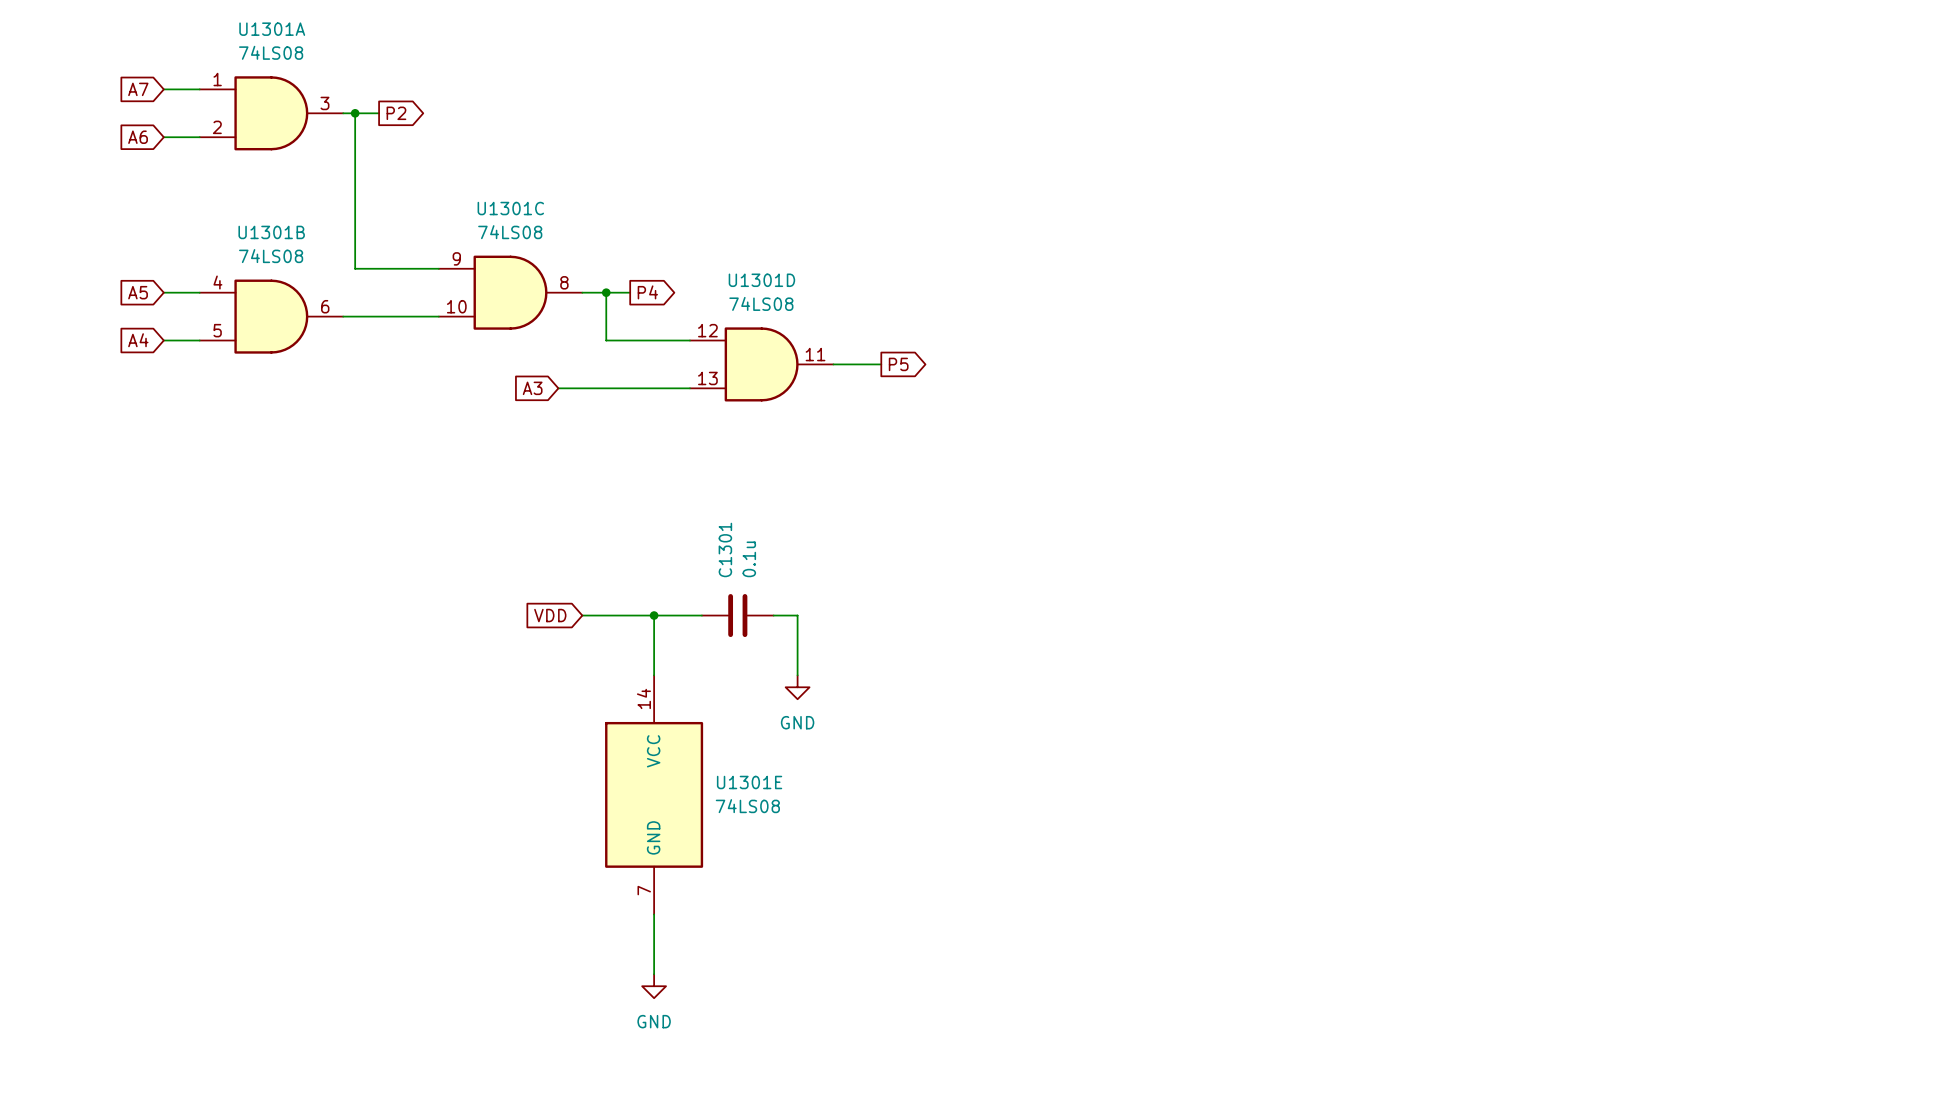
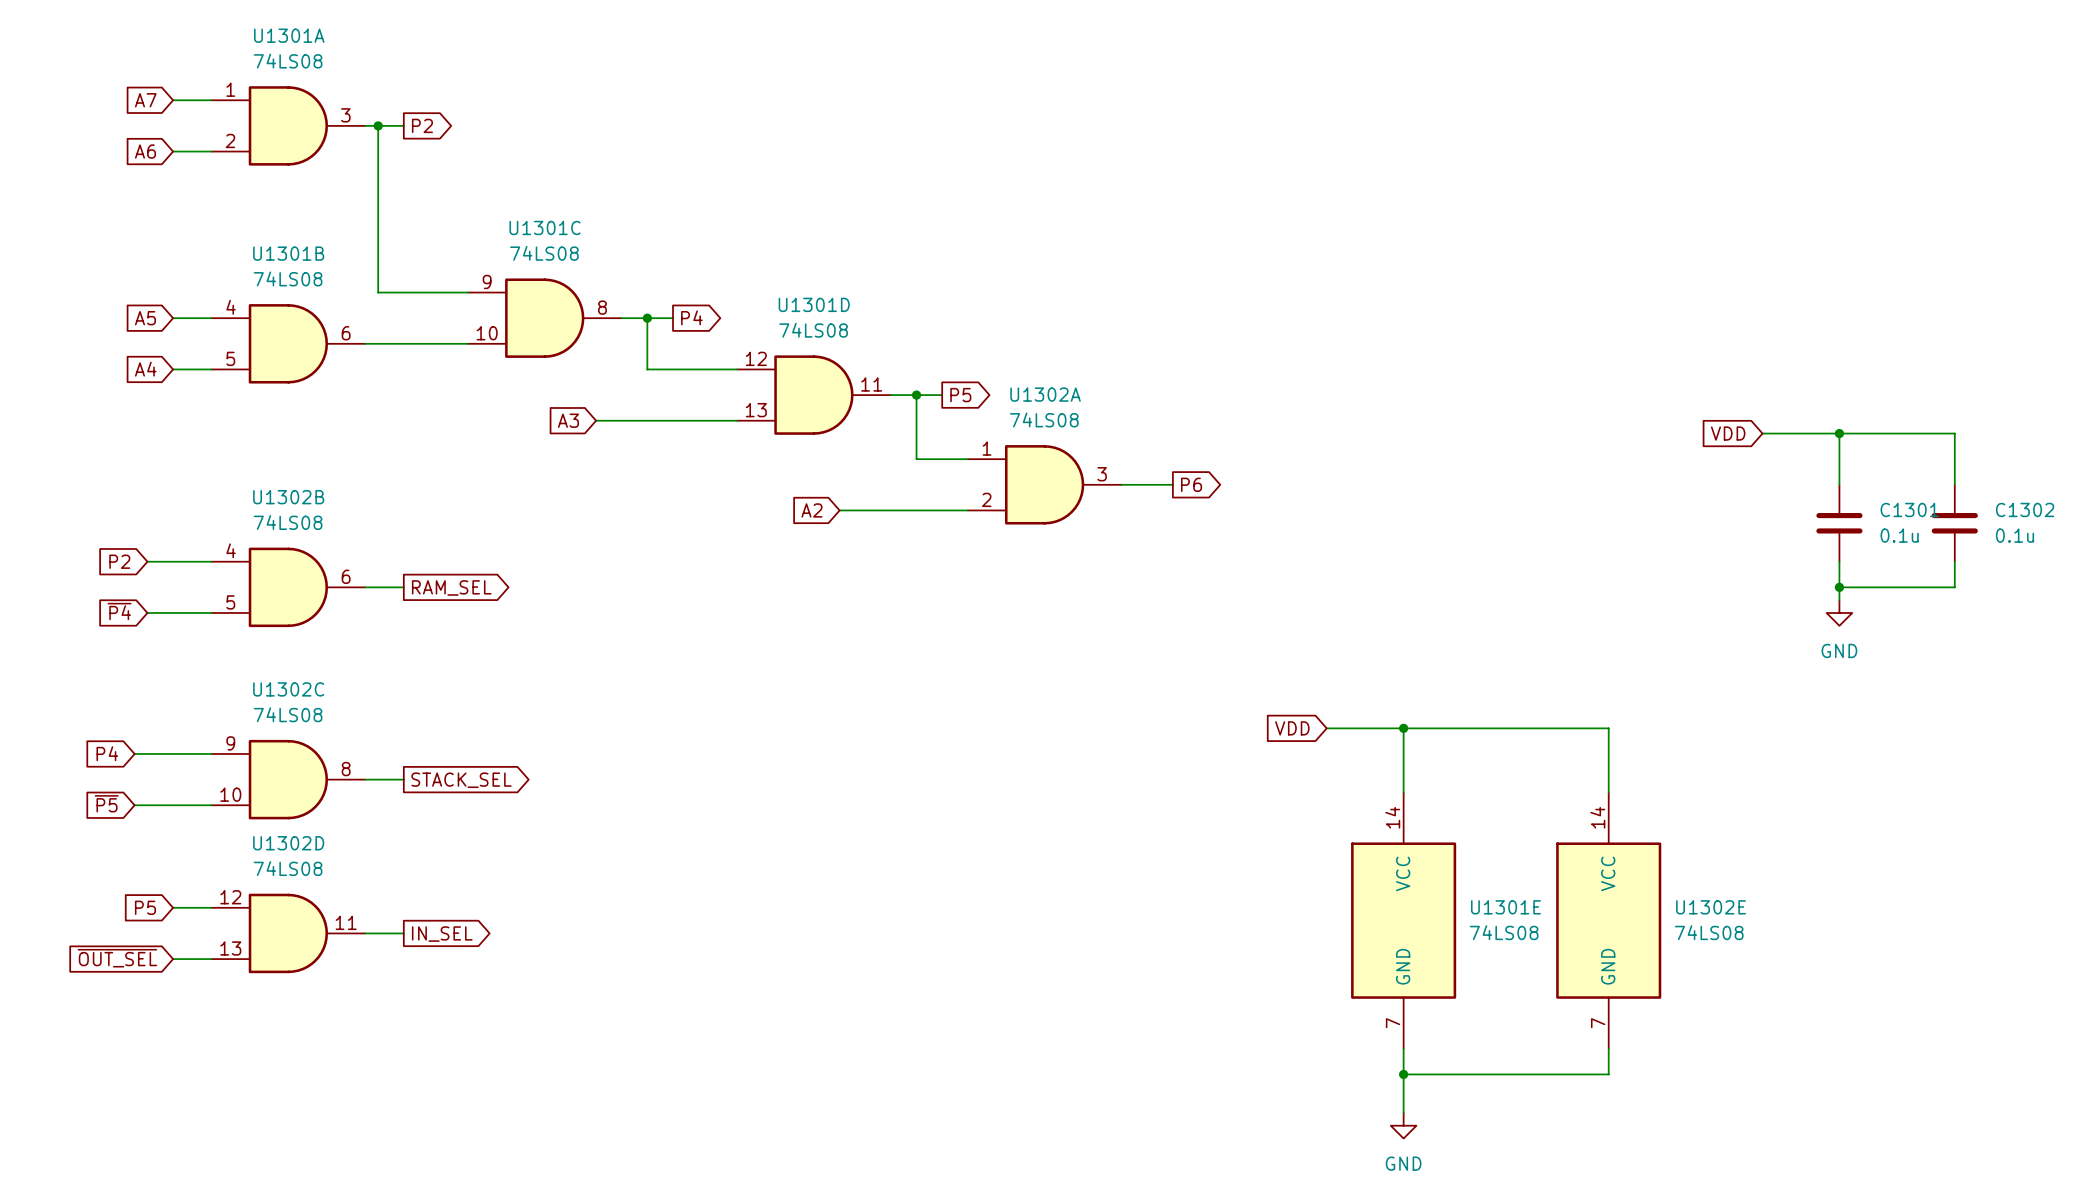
wire: none -> (916, 395) (916, 459) (967, 459)
junction: none -> (916, 395)
global label: none -> VDD (1728, 433)
wire: none -> (1762, 433) (1954, 433) (1954, 484)
wire: none -> (1839, 433) (1839, 484)
junction: none -> (1839, 433)
U1302A: none -> 74LS08 (1044, 484)
wire: none -> (1121, 484) (1172, 484)
global label: none -> P6 (1191, 484)
global label: none -> A2 (811, 510)
wire: none -> (839, 510) (967, 510)
C1302: none -> 0.1u (1954, 523)
global label: none -> P2 (119, 561)
wire: none -> (147, 561) (211, 561)
wire: none -> (1839, 561) (1839, 600)
wire: none -> (1954, 561) (1954, 587) (1839, 587)
U1302B: none -> 74LS08 (288, 587)
wire: none -> (365, 587) (403, 587)
junction: none -> (1839, 587)
global label: none -> RAM_SEL (451, 587)
global label: none -> ~{P4} (119, 611)
wire: none -> (147, 612) (211, 612)
power symbol: none -> GND (1839, 612)
global label: VDD (550, 615) -> none
wire: (582, 615) (701, 615) -> none
wire: (654, 615) (654, 675) -> none
junction: (654, 615) -> none
C1301 rotation: 0° (737, 615) -> 90° clockwise (1839, 523)
C1301 position: (737, 615) -> (1839, 523)
wire: (773, 615) (797, 615) (797, 675) -> none
global label: none -> VDD (1292, 728)
wire: none -> (1326, 728) (1608, 728) (1608, 792)
wire: none -> (1403, 728) (1403, 792)
junction: none -> (1403, 728)
power symbol: GND (797, 687) -> none
global label: none -> P4 (107, 753)
wire: none -> (134, 753) (211, 753)
U1302C: none -> 74LS08 (288, 779)
wire: none -> (365, 779) (403, 779)
global label: none -> STACK_SEL (461, 780)
global label: none -> ~{P5} (106, 803)
wire: none -> (134, 805) (211, 805)
U1301E position: (654, 794) -> (1403, 920)
global label: none -> P5 (145, 907)
wire: none -> (173, 907) (211, 907)
U1302E: none -> 74LS08 (1608, 920)
U1302D: none -> 74LS08 (288, 933)
wire: none -> (365, 933) (403, 933)
global label: none -> IN_SEL (442, 934)
global label: none -> ~{OUT_SEL} (117, 958)
wire: none -> (173, 959) (211, 959)
wire: (654, 914) (654, 974) -> none
wire: none -> (1403, 1048) (1403, 1112)
wire: none -> (1608, 1048) (1608, 1074) (1403, 1074)
power symbol: GND (654, 986) -> none
junction: none -> (1403, 1074)
power symbol: none -> GND (1403, 1125)

